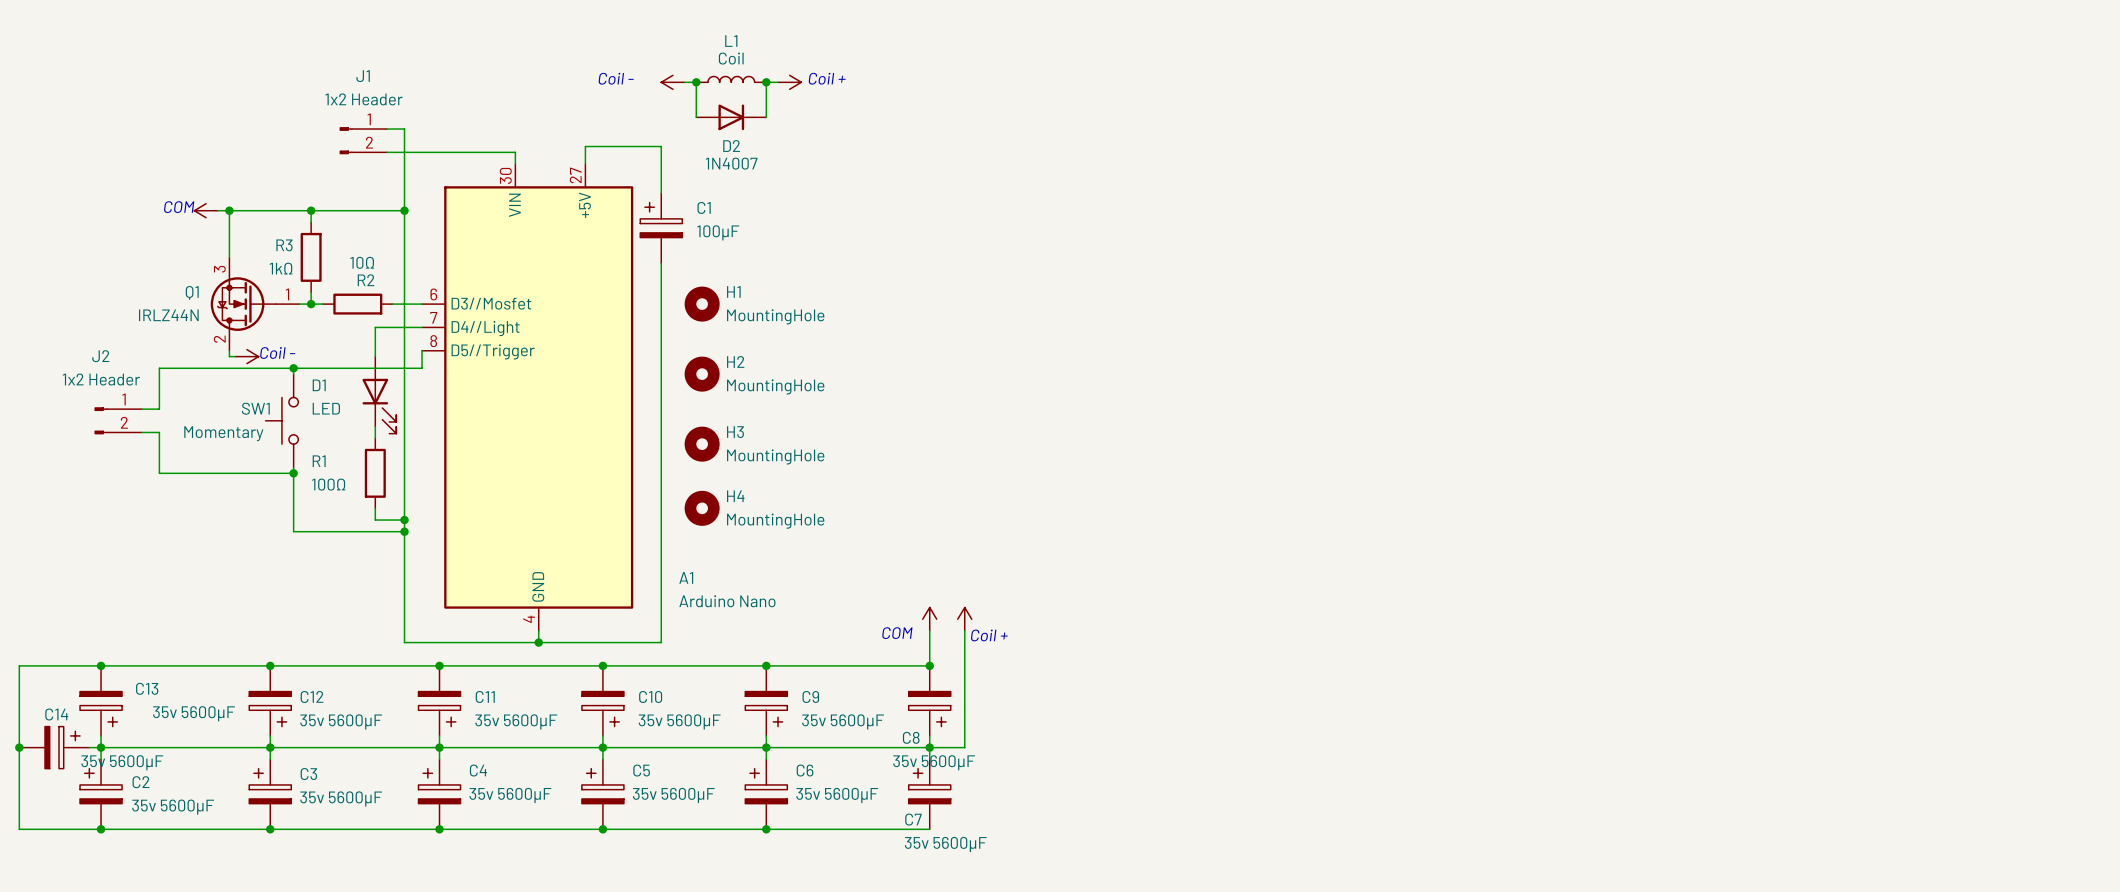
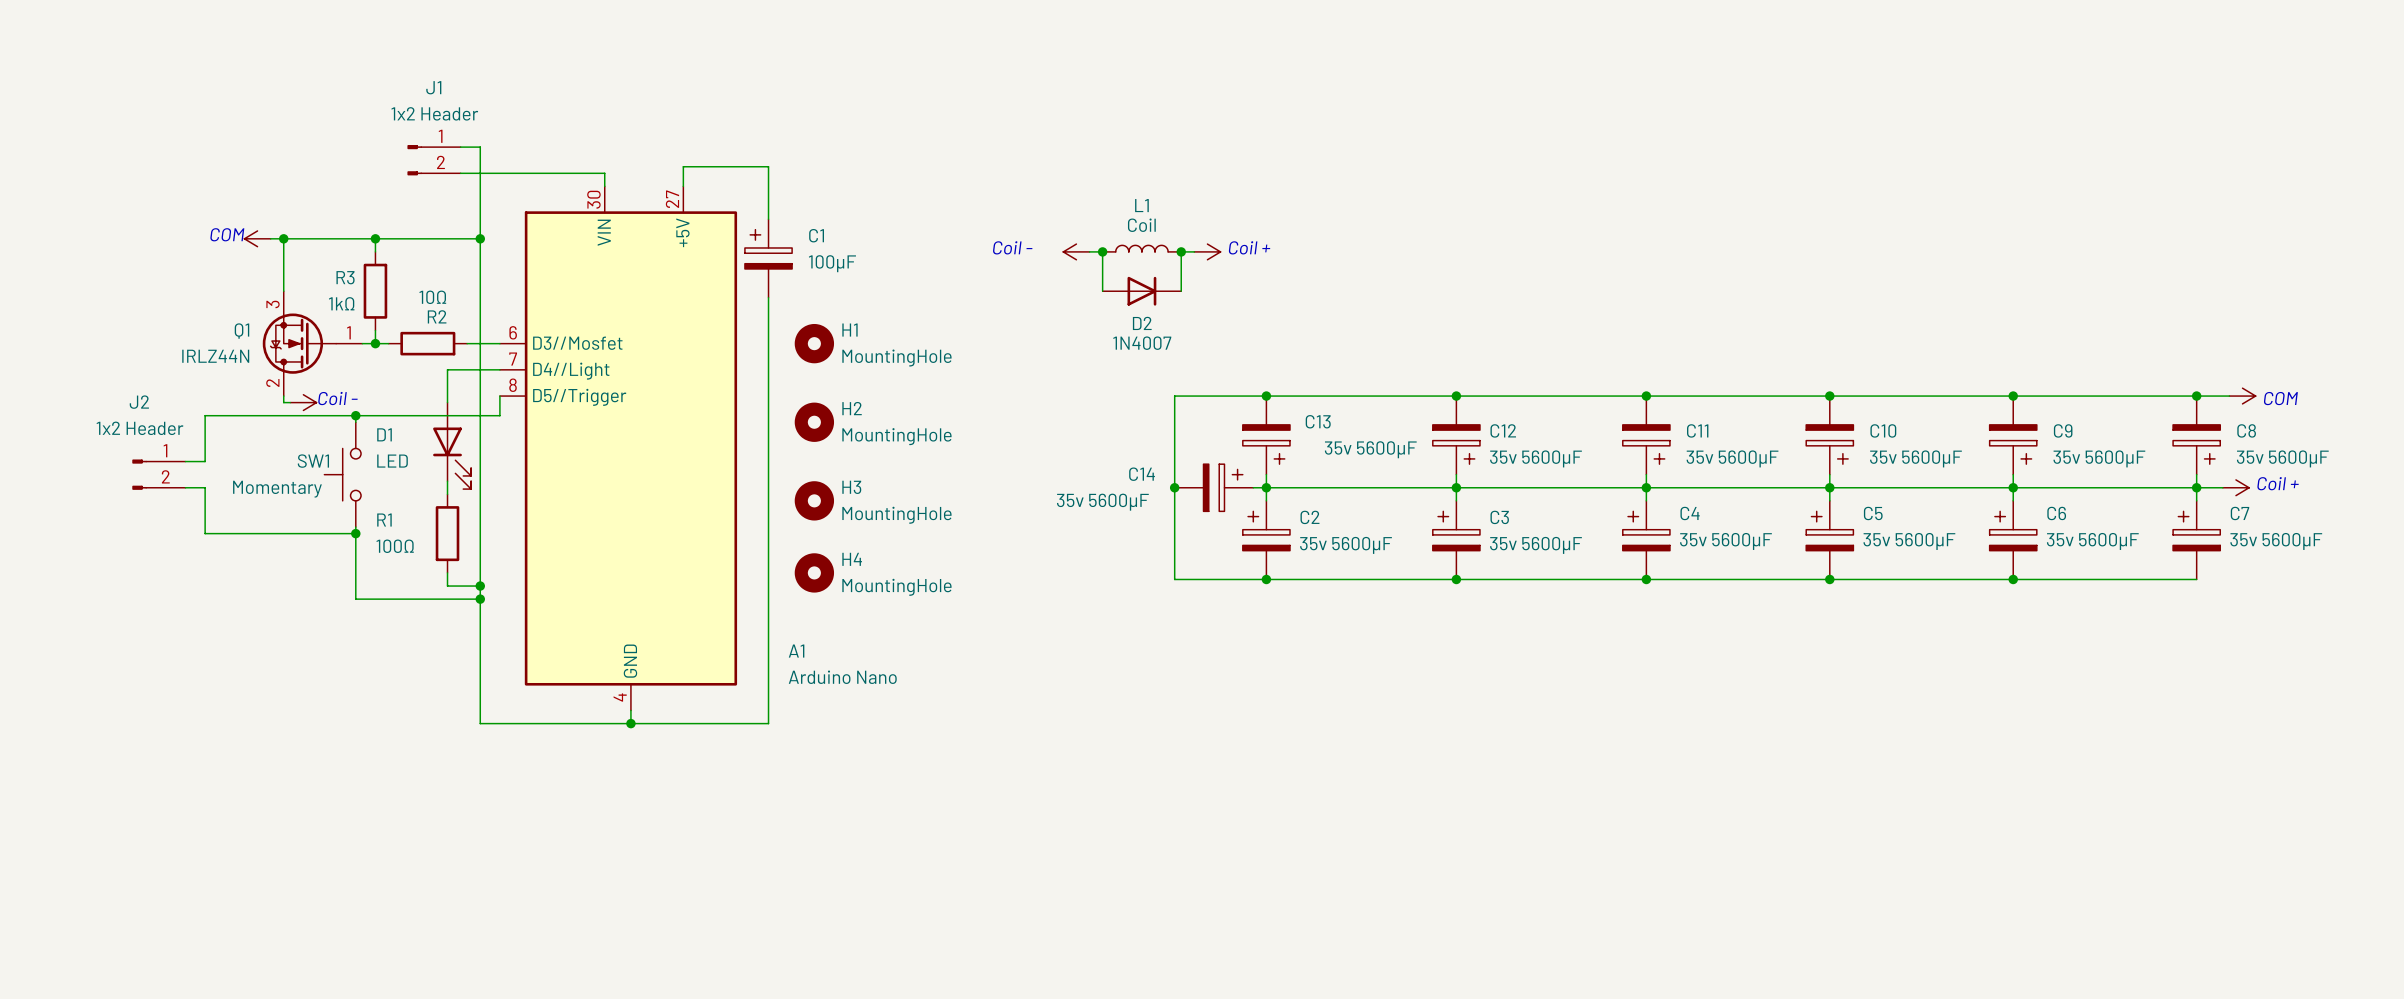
L1 symbol: [696, 76, 767, 83] -> [1102, 245, 1182, 252]
text: Coil - (616, 78) -> none
text: Coil + (827, 78) -> none
power symbol: (672, 82) -> none
wire: (684, 82) (696, 82) (696, 117) -> none
junction: (696, 82) -> none
junction: (766, 82) -> none
wire: (777, 82) (766, 82) (766, 117) -> none
power symbol: (789, 82) -> none
D2 position: (731, 117) -> (1141, 291)
text: none -> Coil - (1012, 247)
text: none -> Coil + (1249, 247)
power symbol: none -> (1076, 251)
wire: none -> (1089, 251) (1102, 251) (1102, 291)
junction: none -> (1102, 251)
junction: none -> (1181, 251)
wire: none -> (1194, 251) (1181, 251) (1181, 291)
power symbol: none -> (1207, 251)
junction: none -> (1266, 396)
junction: none -> (1456, 396)
junction: none -> (1646, 396)
junction: none -> (1829, 396)
junction: none -> (2013, 396)
junction: none -> (2196, 396)
wire: none -> (2229, 396) (1174, 396) (1174, 579) (2196, 579)
power symbol: none -> (2242, 396)
text: none -> COM (2280, 398)
wire: none -> (1266, 474) (1266, 500)
wire: none -> (1456, 474) (1456, 500)
wire: none -> (1646, 474) (1646, 500)
wire: none -> (1829, 474) (1829, 500)
wire: none -> (2013, 474) (2013, 500)
wire: none -> (2196, 474) (2196, 500)
text: none -> Coil + (2278, 483)
junction: none -> (1174, 487)
wire: none -> (1253, 487) (2222, 487)
junction: none -> (1266, 487)
junction: none -> (1456, 487)
junction: none -> (1646, 487)
junction: none -> (1829, 487)
junction: none -> (2013, 487)
junction: none -> (2196, 487)
power symbol: none -> (2235, 487)
junction: none -> (1266, 579)
junction: none -> (1456, 579)
junction: none -> (1646, 579)
junction: none -> (1829, 579)
junction: none -> (2013, 579)
power symbol: (929, 619) -> none
power symbol: (964, 619) -> none
wire: (929, 630) (929, 665) (19, 665) (19, 829) (929, 829) -> none
wire: (964, 630) (964, 747) (89, 747) -> none
text: COM (897, 633) -> none
text: Coil + (989, 635) -> none
junction: (101, 665) -> none
junction: (270, 665) -> none
junction: (439, 665) -> none
junction: (602, 665) -> none
junction: (766, 665) -> none
junction: (929, 665) -> none
C13 position: (101, 700) -> (1266, 435)
C12 position: (270, 700) -> (1456, 435)
C11 position: (439, 700) -> (1646, 435)
C10 position: (602, 700) -> (1829, 435)
C9 position: (766, 700) -> (2013, 435)
C8 position: (929, 700) -> (2196, 435)
C14 name position: C14 (56, 714) -> C14 (1142, 474)
wire: (101, 735) (101, 759) -> none
wire: (270, 735) (270, 759) -> none
wire: (439, 735) (439, 759) -> none
wire: (602, 735) (602, 759) -> none
wire: (766, 735) (766, 759) -> none
wire: (929, 735) (929, 759) -> none
C8 name position: C8 (911, 737) -> C8 (2246, 430)
junction: (19, 747) -> none
C14 position: (54, 747) -> (1213, 487)
junction: (101, 747) -> none
junction: (270, 747) -> none
junction: (439, 747) -> none
junction: (602, 747) -> none
junction: (766, 747) -> none
junction: (929, 747) -> none
C14 value position: 35v 5600µF (122, 762) -> 35v 5600µF (1102, 502)
C8 value position: 35v 5600µF (934, 762) -> 35v 5600µF (2282, 458)
C2 name position: C2 (141, 782) -> C2 (1309, 517)
C2 position: (101, 794) -> (1266, 540)
C3 position: (270, 794) -> (1456, 540)
C4 position: (439, 794) -> (1646, 540)
C5 position: (602, 794) -> (1829, 540)
C6 position: (766, 794) -> (2013, 540)
C7 position: (929, 794) -> (2196, 540)
C2 value position: 35v 5600µF (173, 807) -> 35v 5600µF (1346, 545)
C7 name position: C7 (913, 819) -> C7 (2239, 513)
junction: (101, 829) -> none
junction: (270, 829) -> none
junction: (439, 829) -> none
junction: (602, 829) -> none
junction: (766, 829) -> none
C7 value position: 35v 5600µF (945, 844) -> 35v 5600µF (2276, 541)

